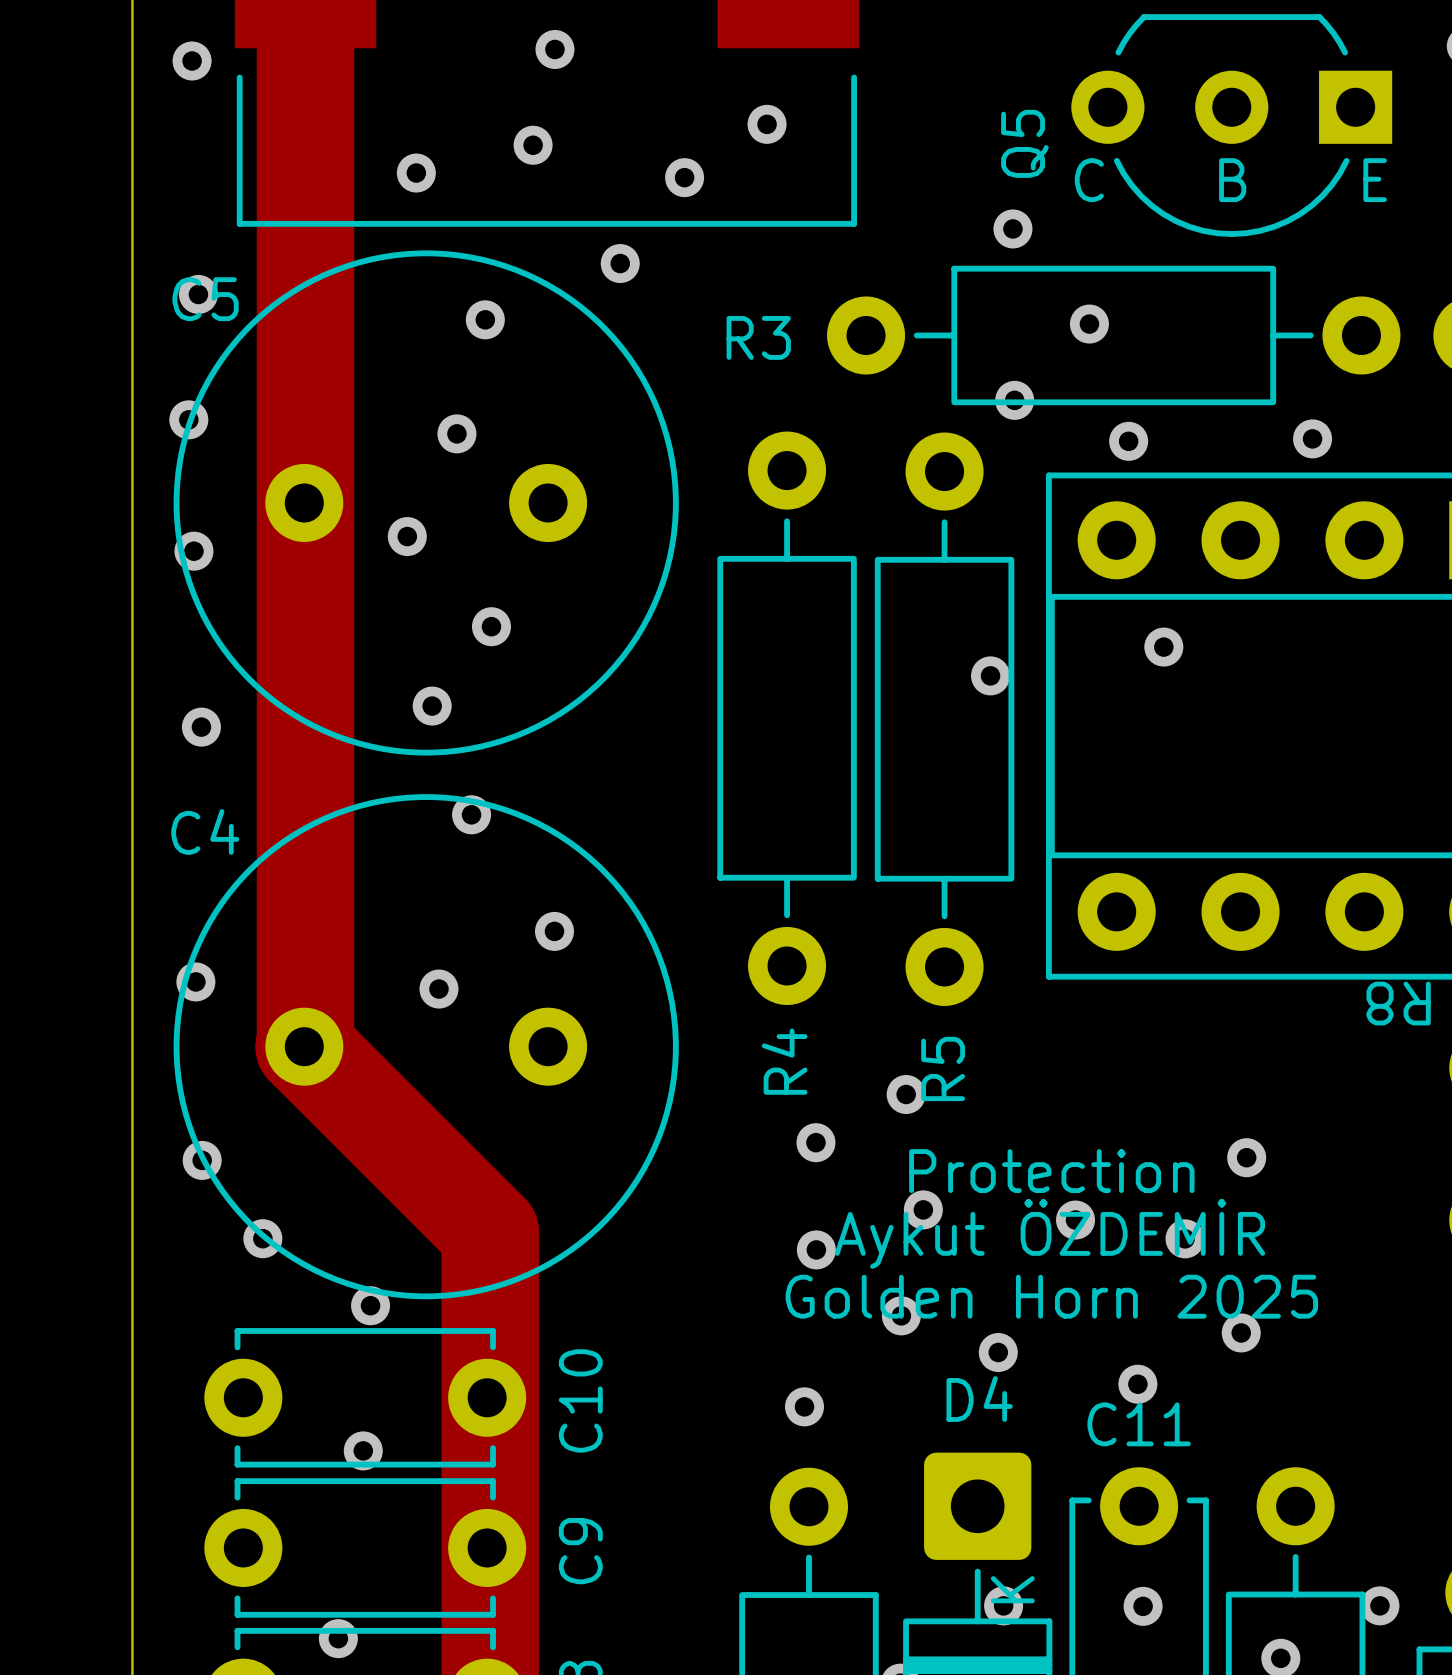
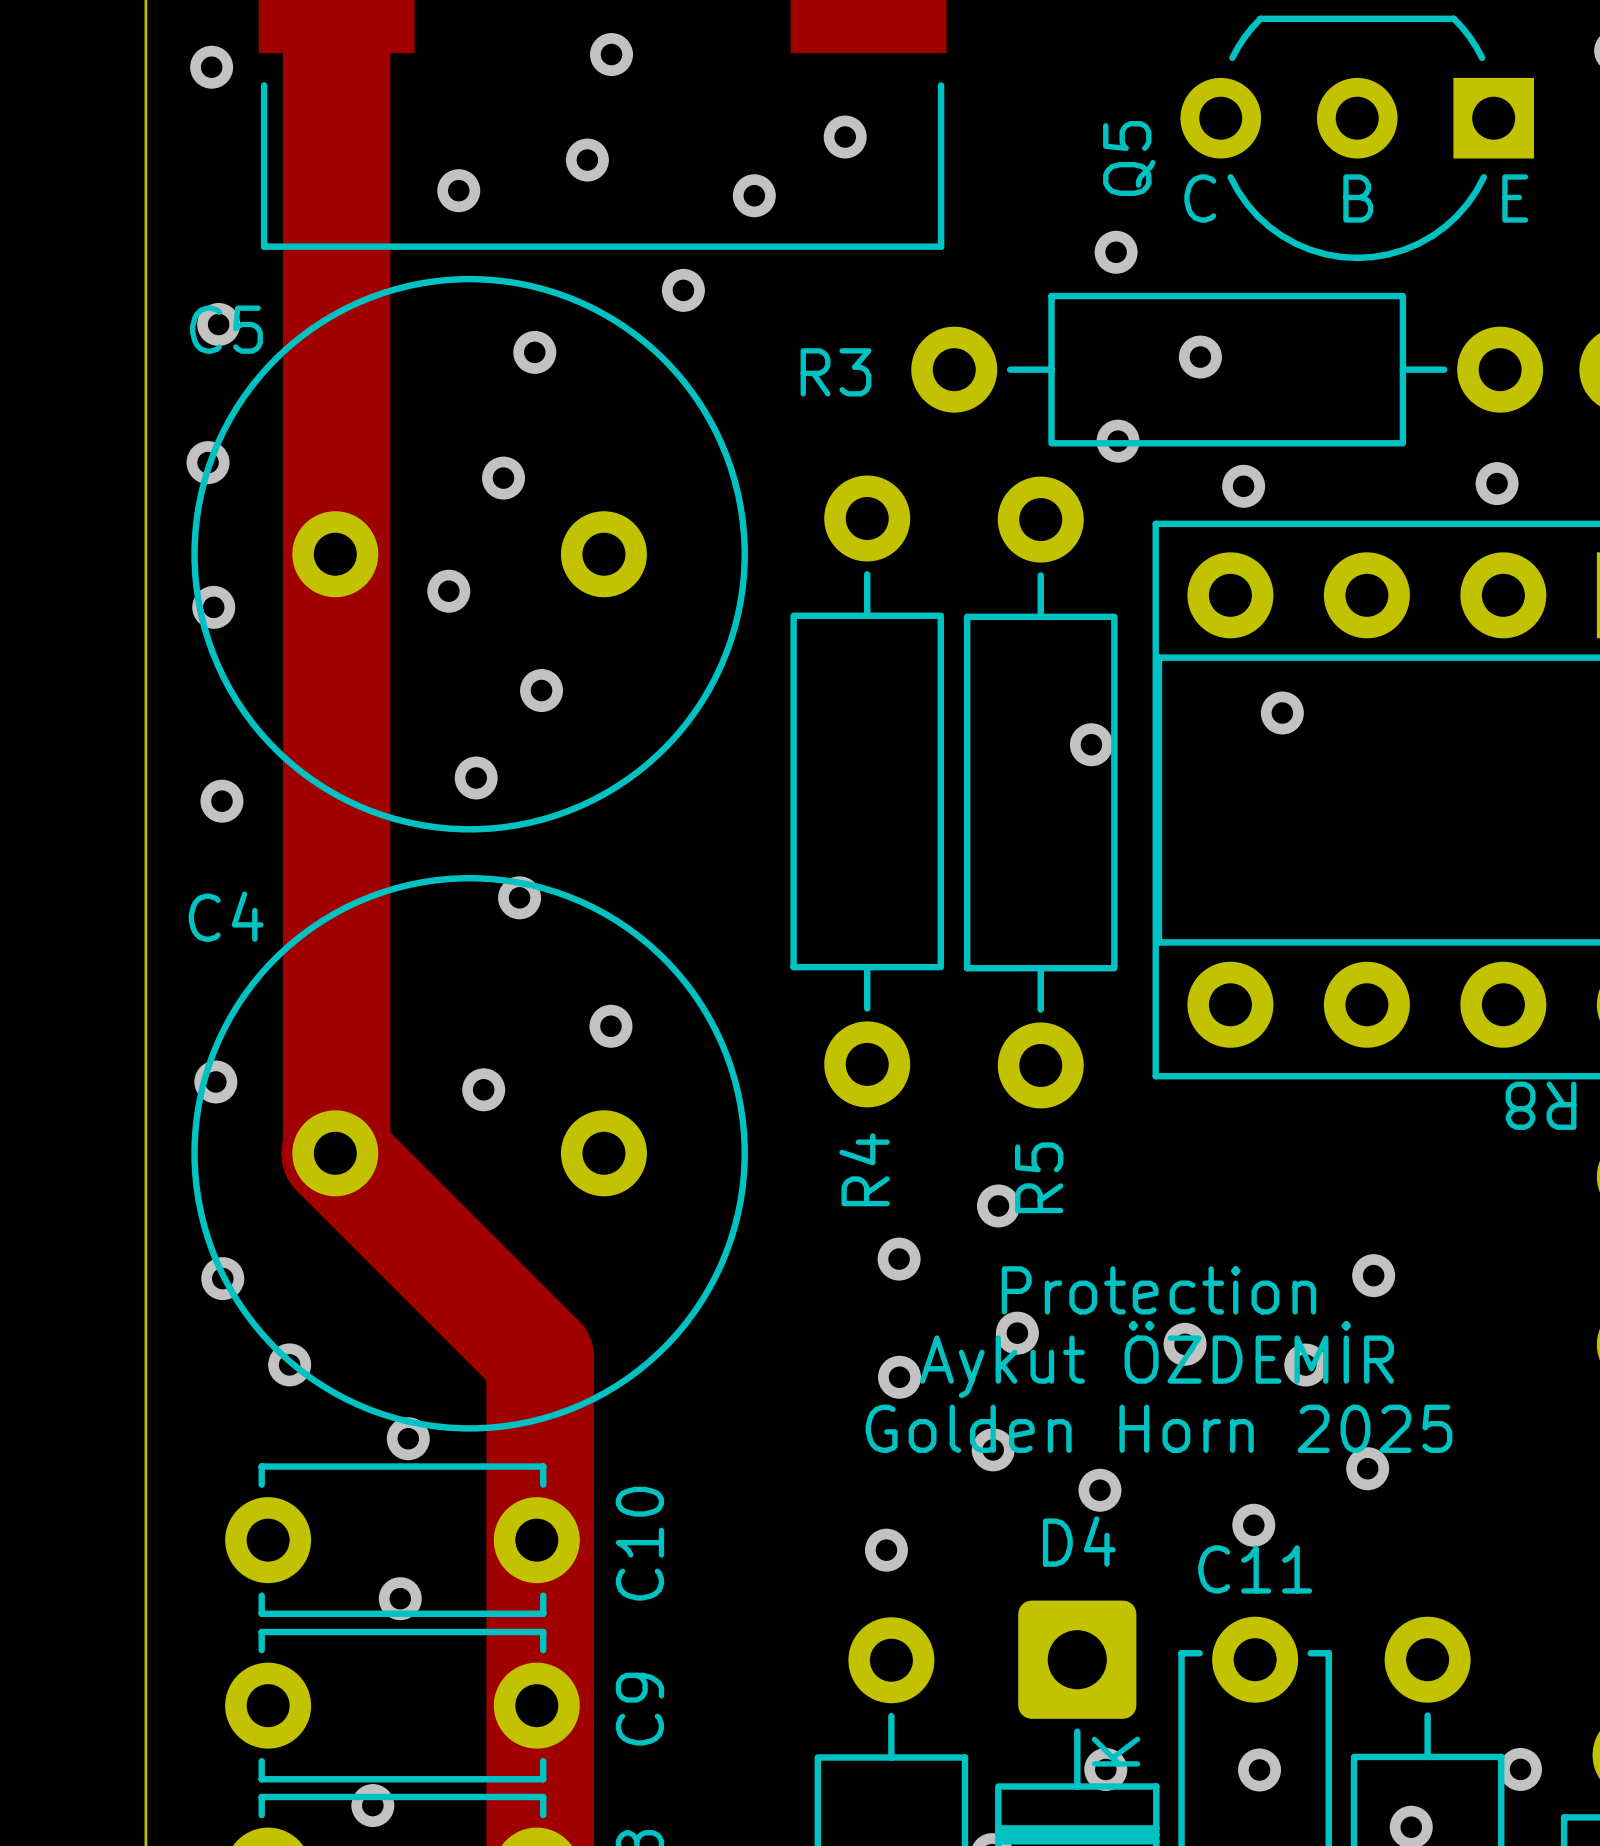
via position: (1312, 438) -> (1497, 483)

